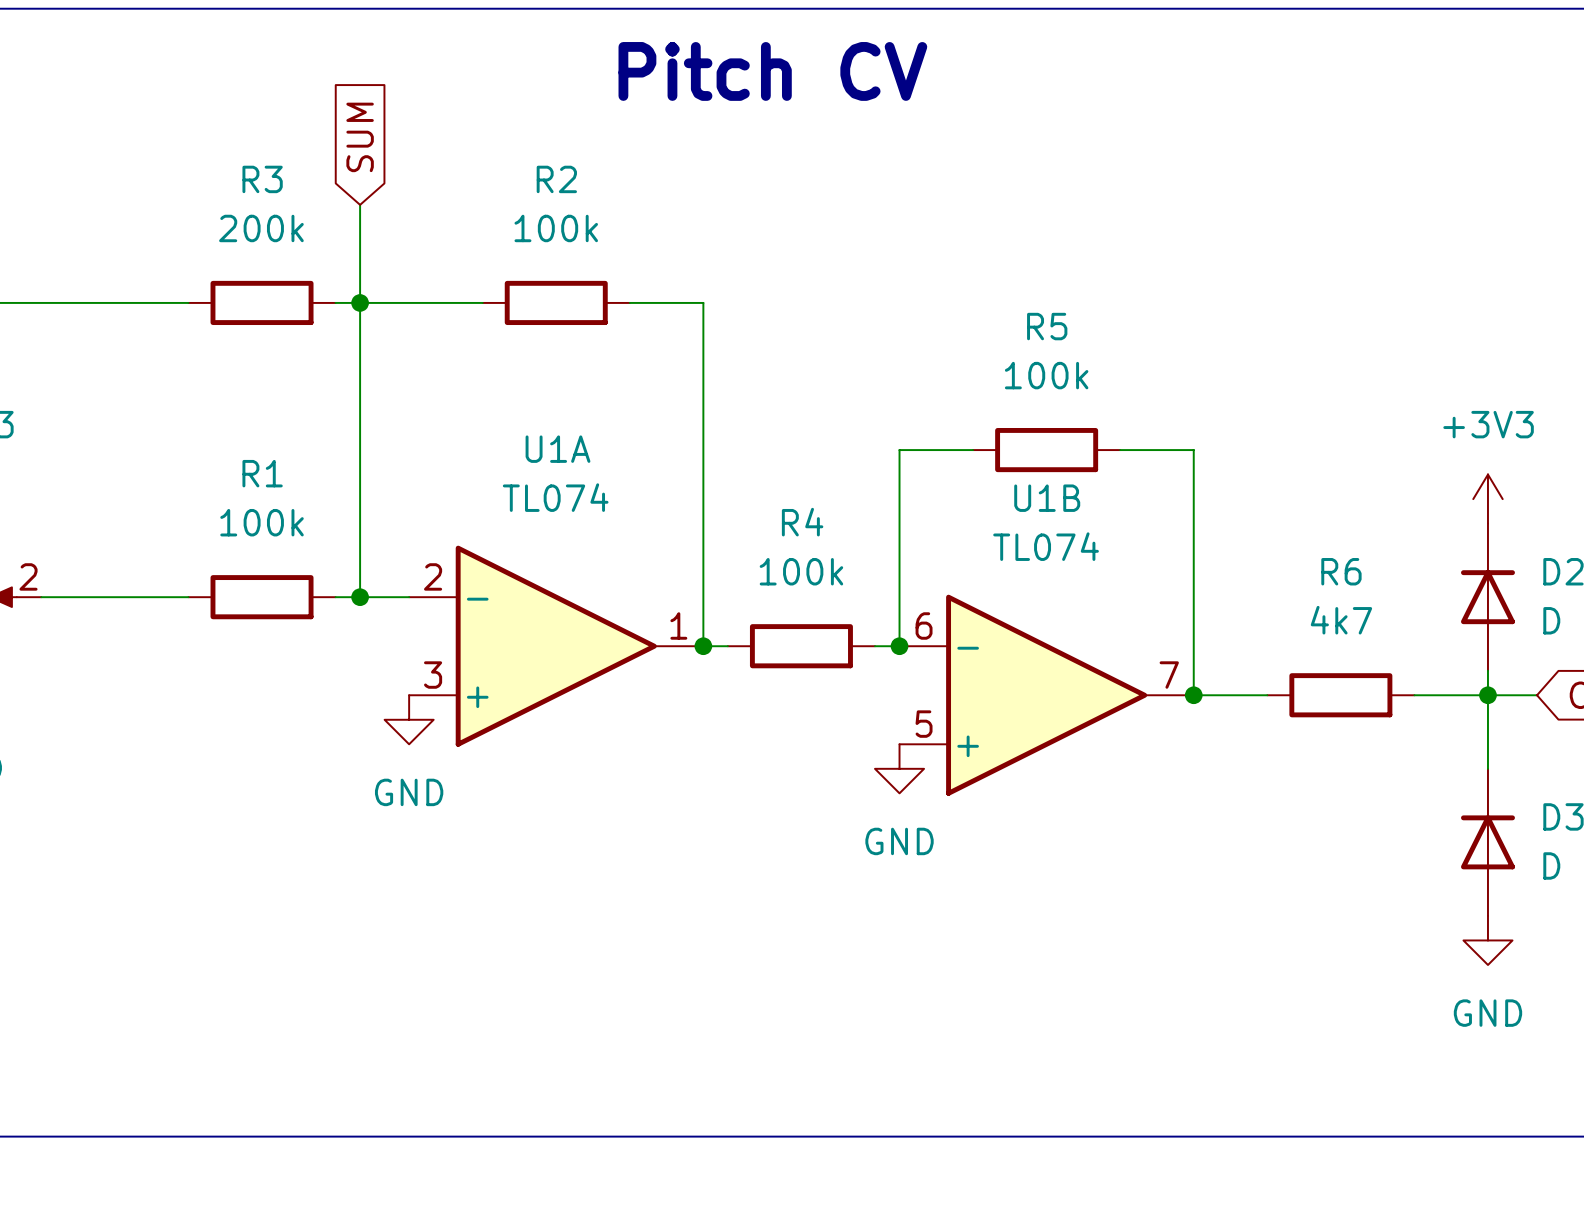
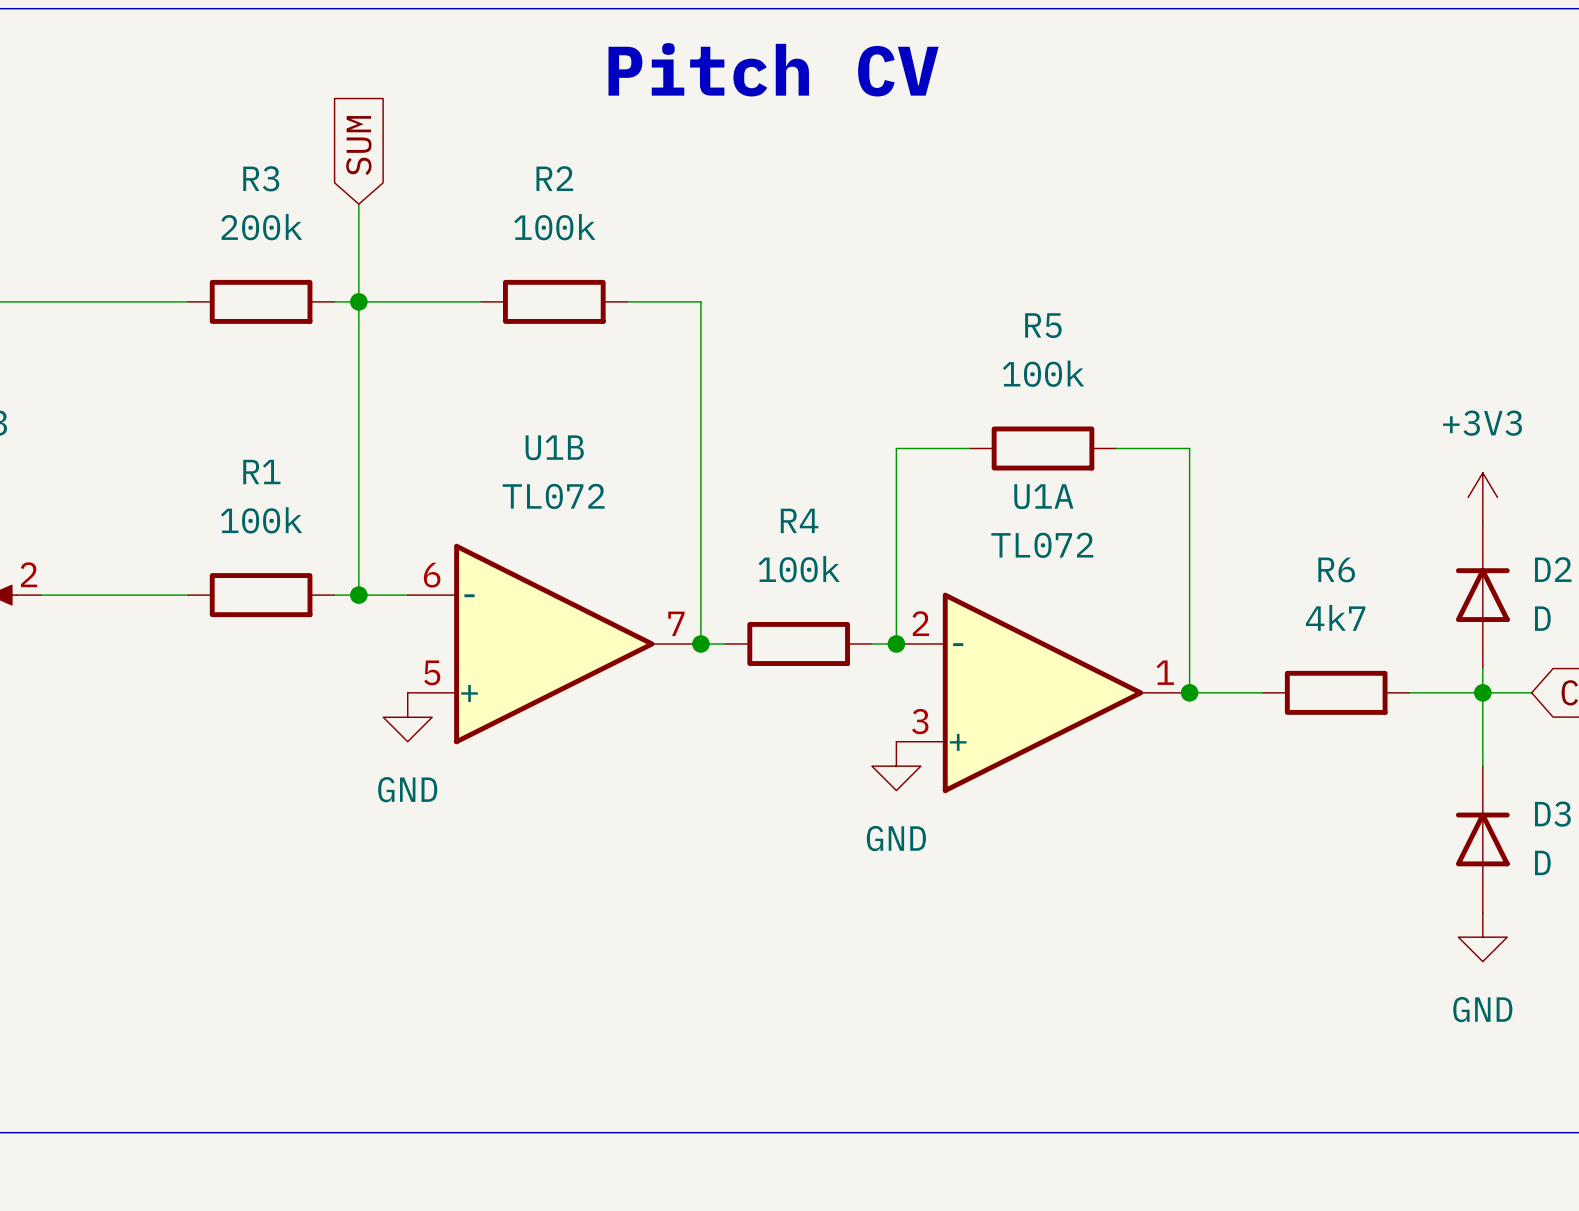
U1A value: TL074 (555, 497) -> TL072 (1042, 545)
U1B value: TL074 (1046, 546) -> TL072 (553, 496)
U1A position: (556, 646) -> (1043, 692)
U1B position: (1046, 695) -> (554, 643)

